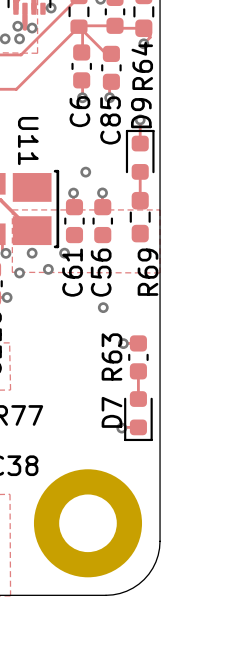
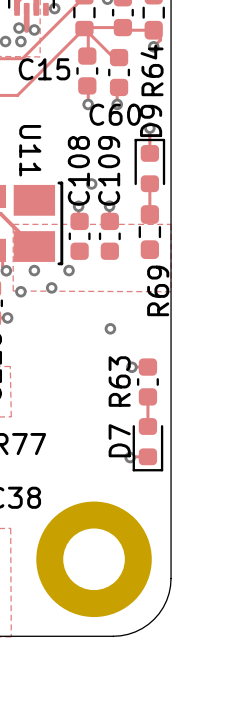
C6 name: C6 (79, 111) -> C15 (44, 69)
C85 name: C85 (110, 120) -> C60 (115, 114)
C61 name: C61 (72, 272) -> C108 (78, 170)
C56 name: C56 (101, 272) -> C109 (109, 170)

